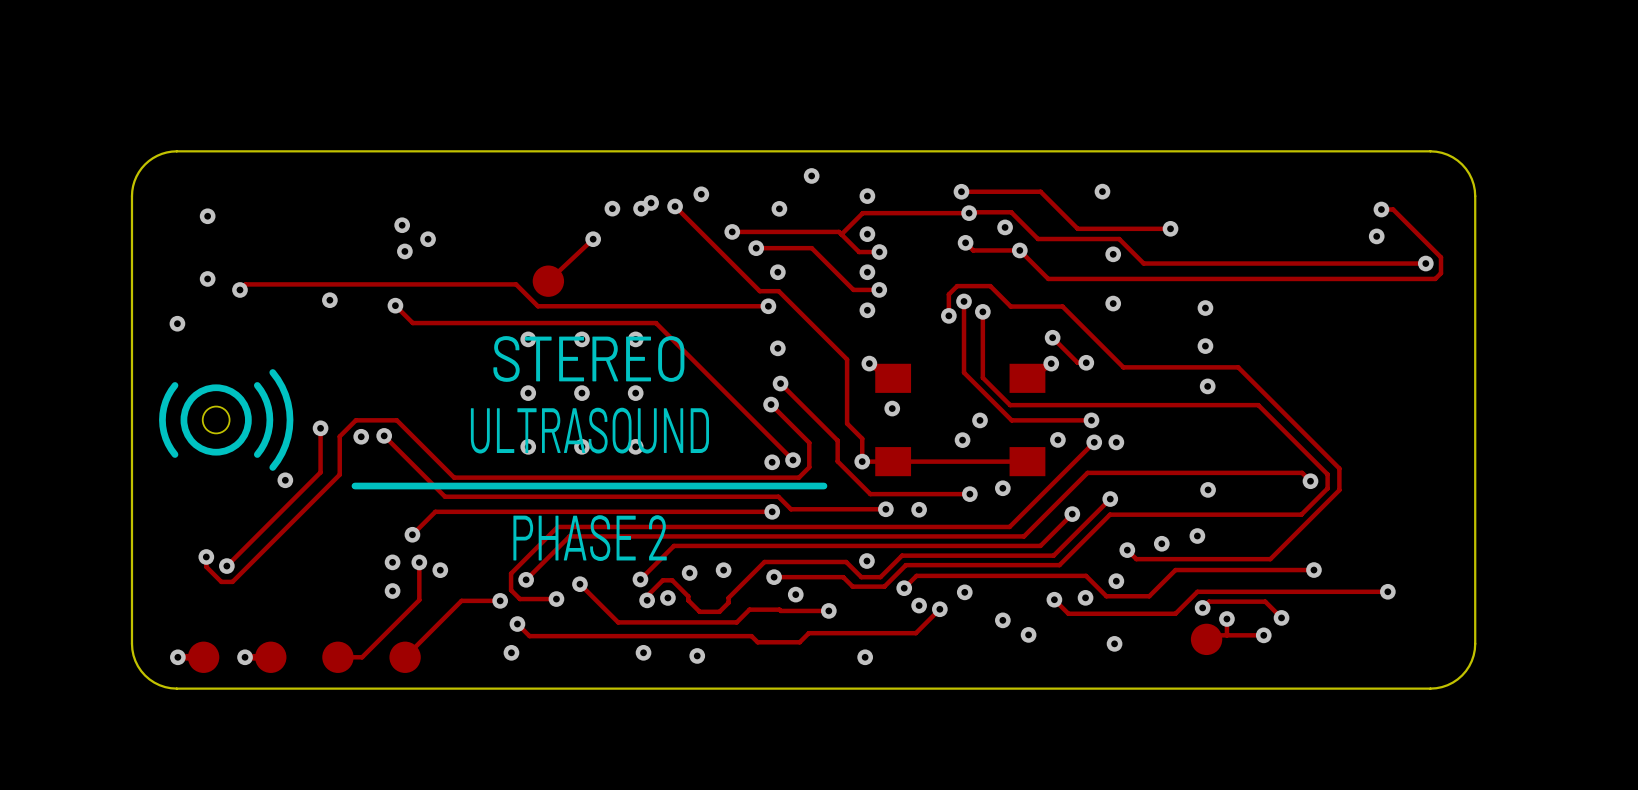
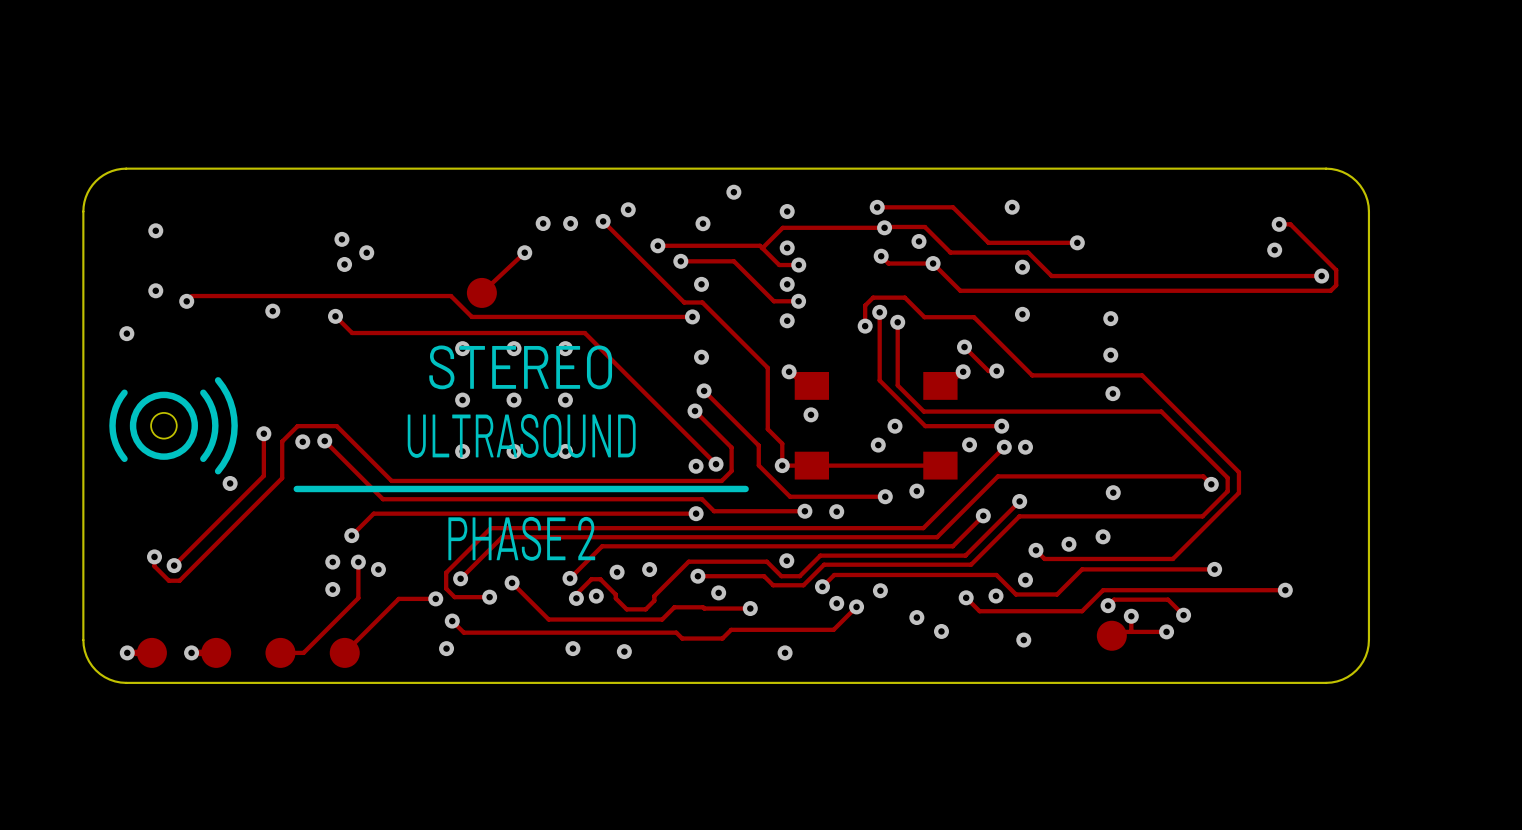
via: (651, 202) -> none

